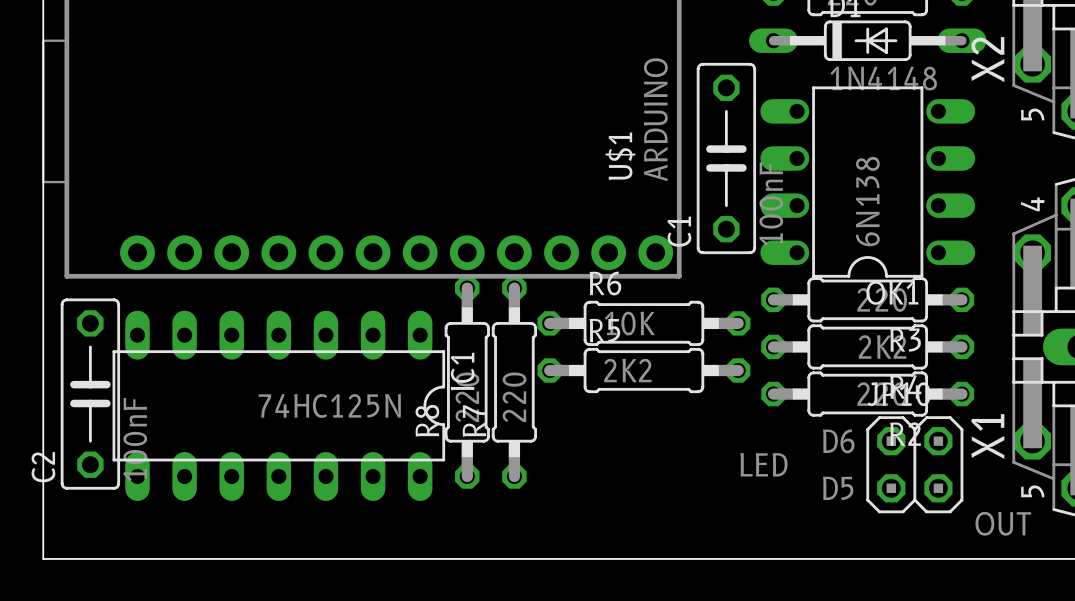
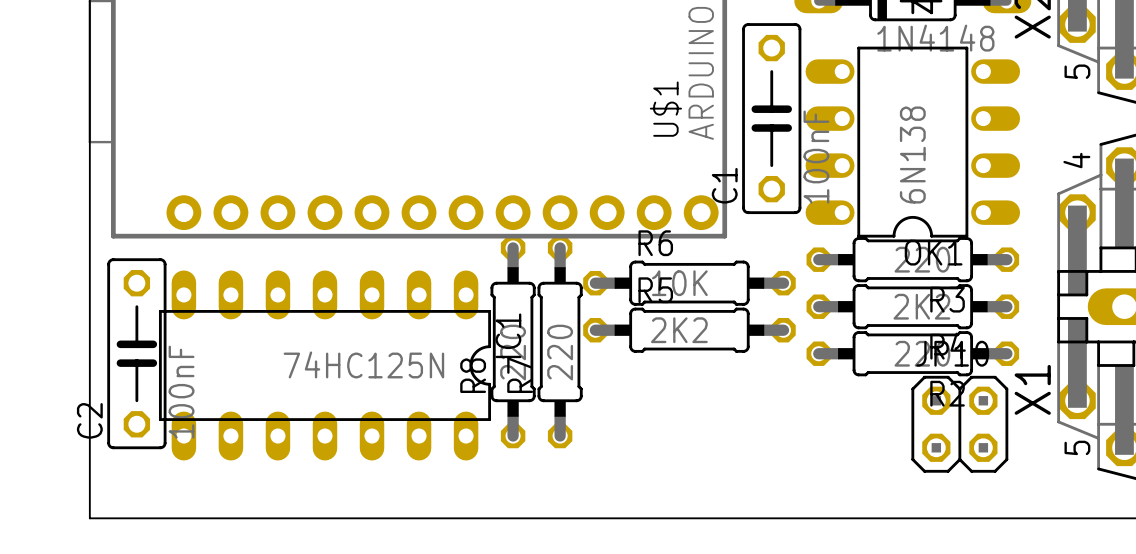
text: D6 (838, 441) -> none
text: LED (763, 464) -> none
text: D5 (838, 488) -> none
text: OUT (1003, 523) -> none

